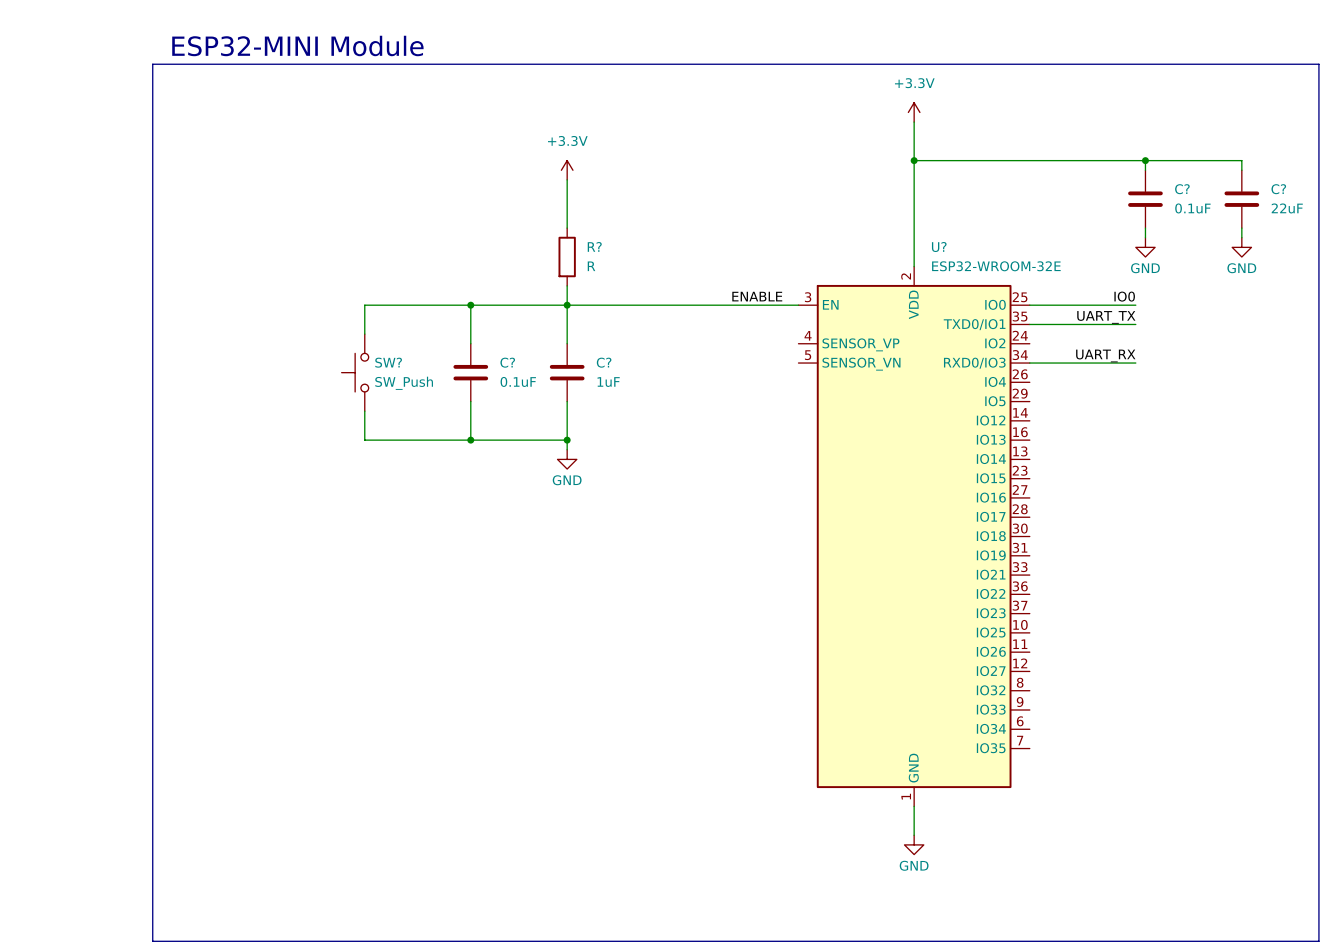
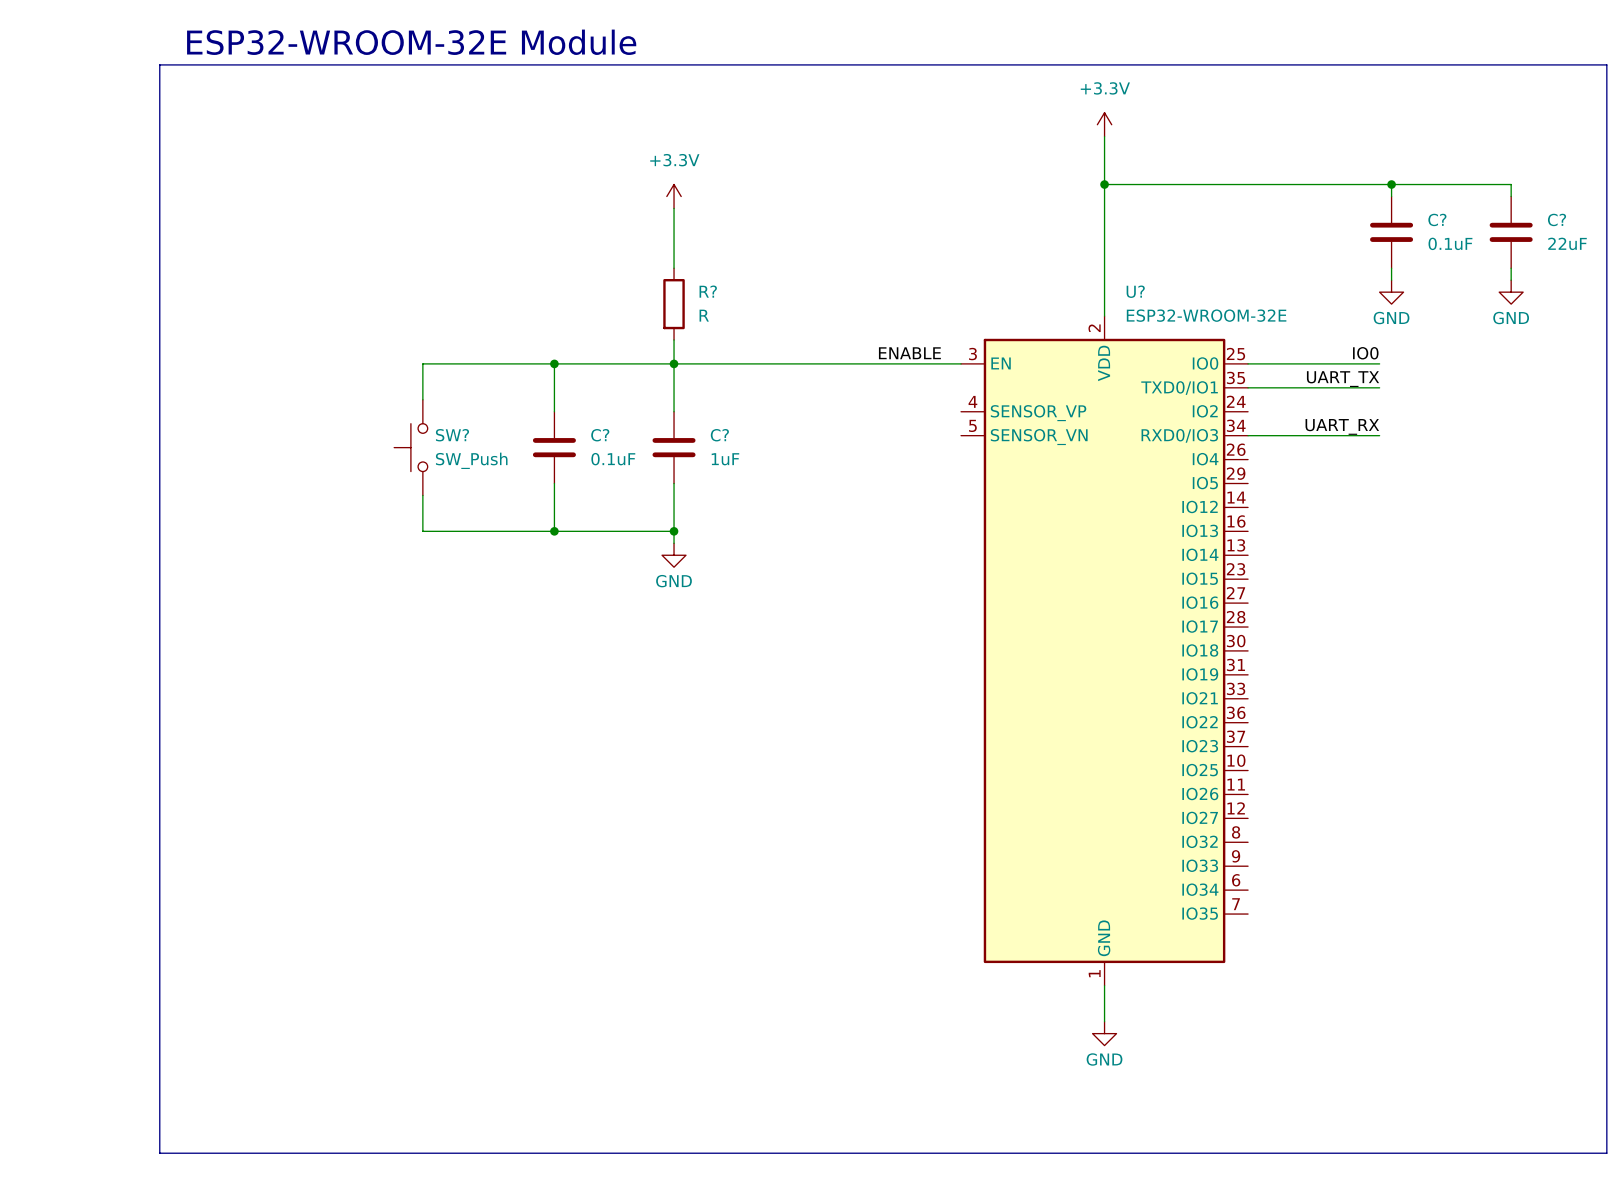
text: ESP32-MINI Module (297, 45) -> ESP32-WROOM-32E Module (411, 42)

